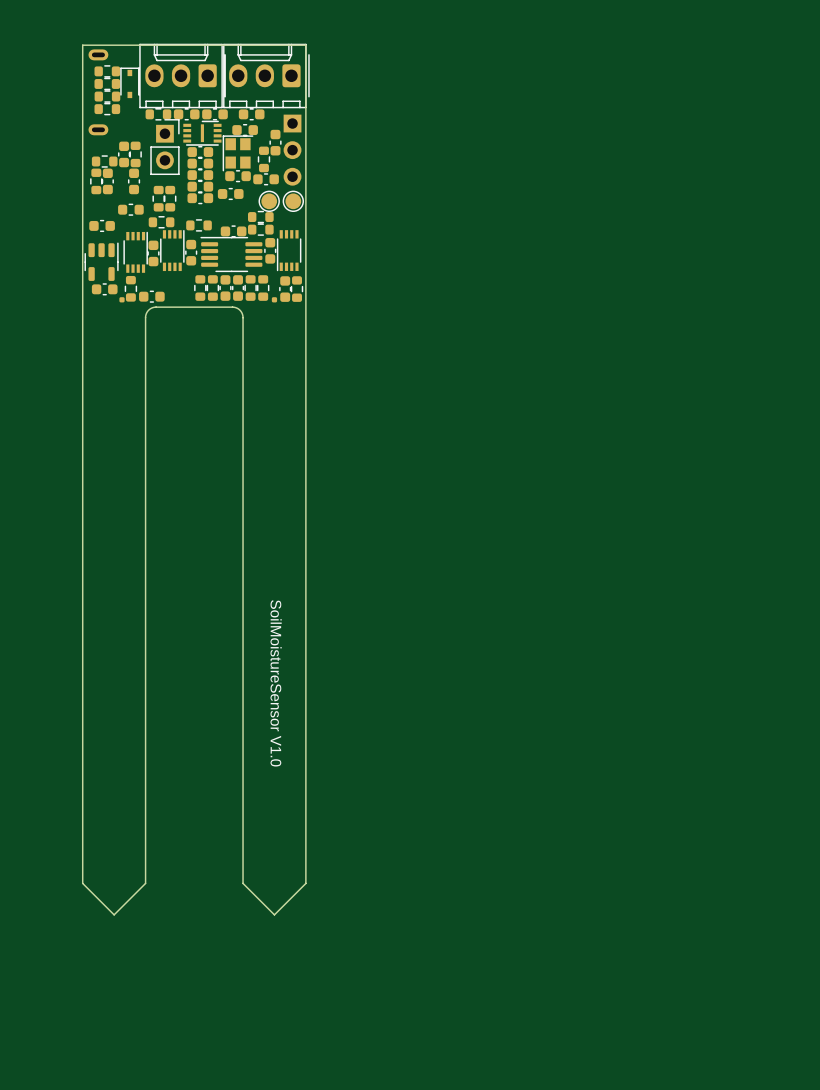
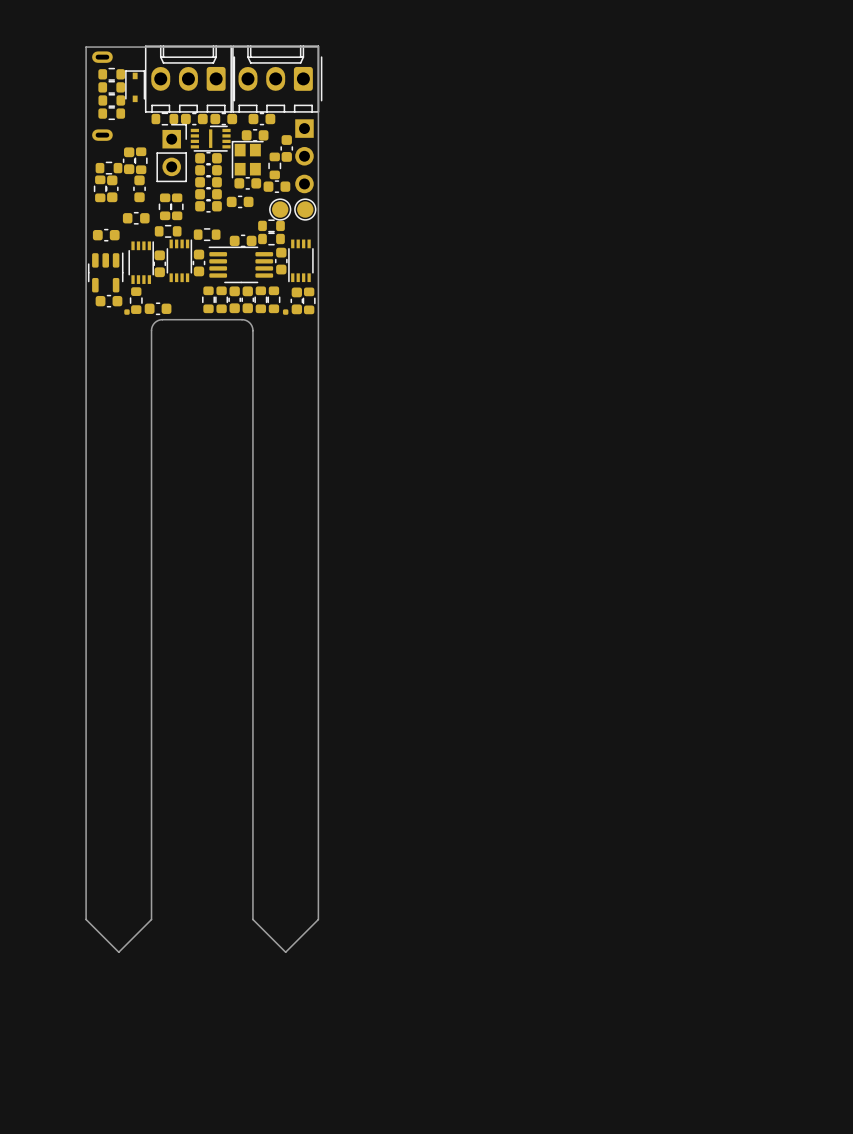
text: SoilMoistureSensor V1.0 (276, 683) -> none

